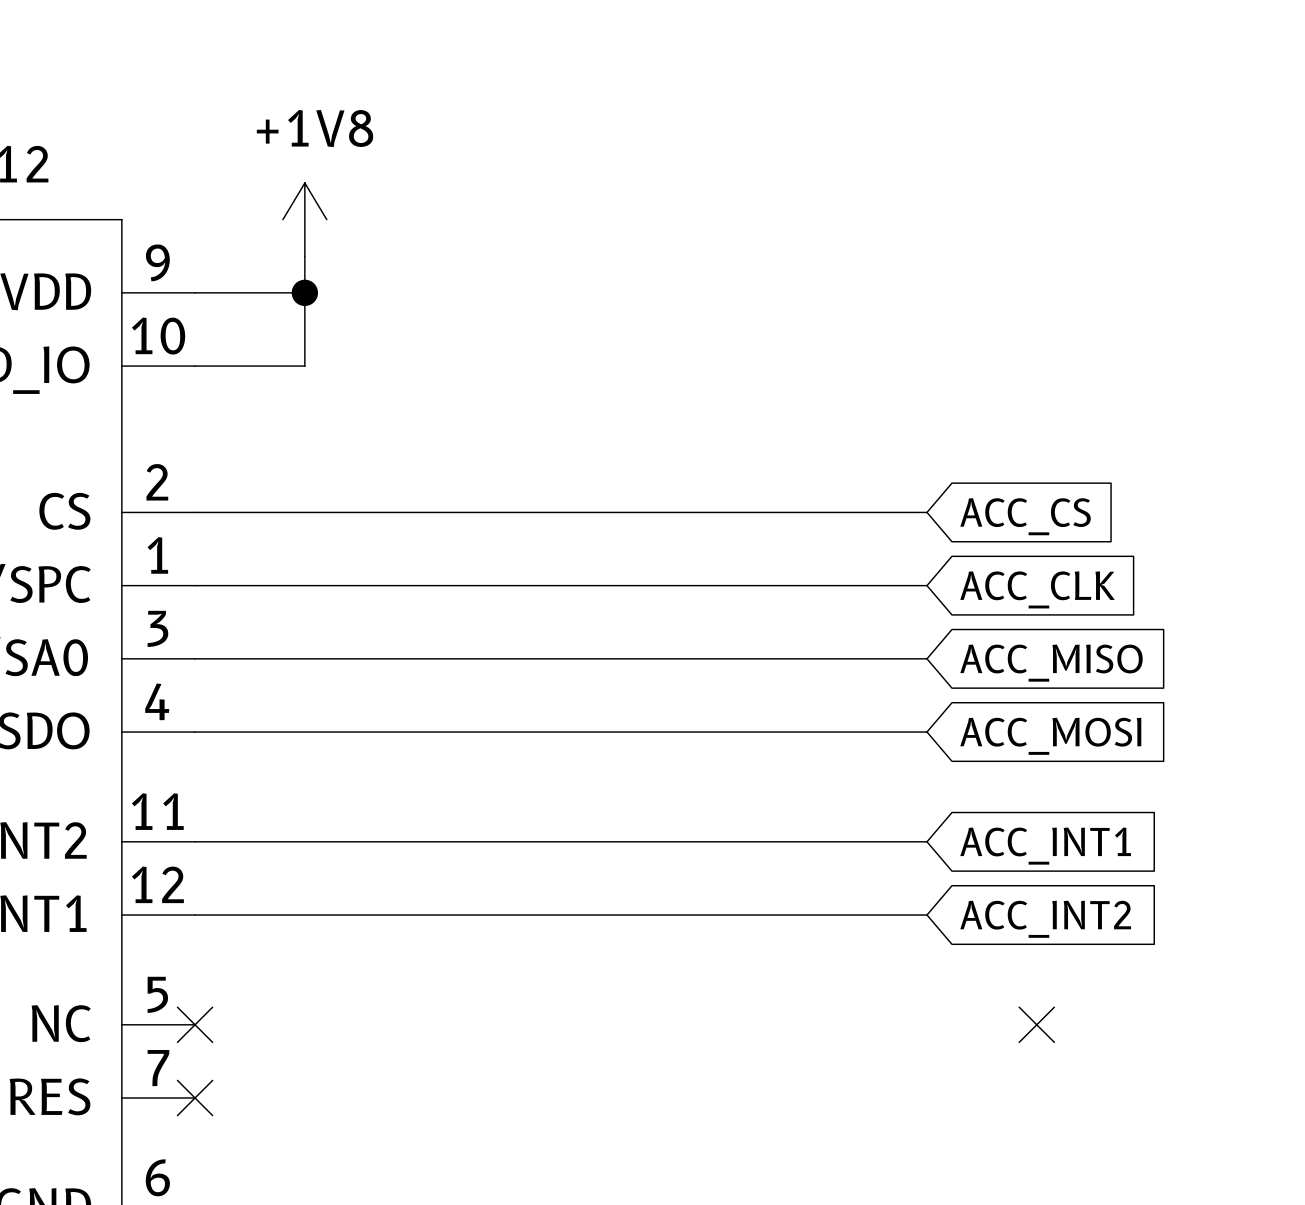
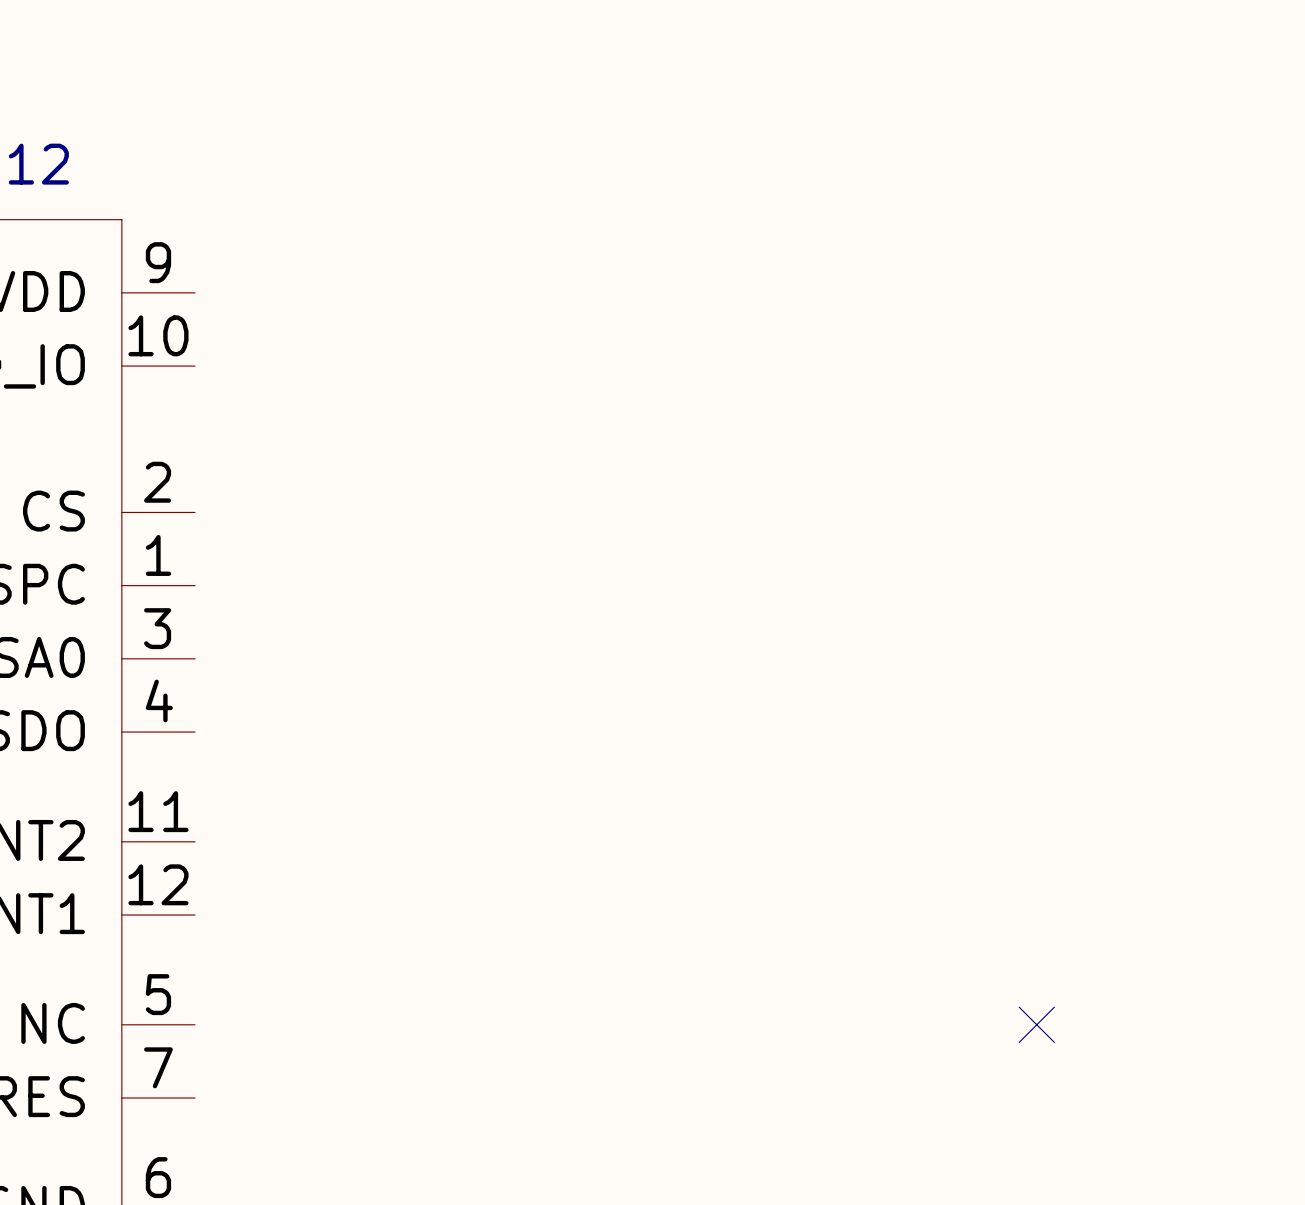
power symbol: +1V8 (304, 219) -> none
wire: (304, 256) (304, 366) (195, 366) -> none
wire: (195, 292) (304, 292) -> none
junction: (304, 292) -> none
wire: (195, 512) (927, 512) -> none
global label: ACC_CS (1025, 516) -> none
wire: (195, 585) (927, 585) -> none
global label: ACC_CLK (1037, 589) -> none
wire: (195, 658) (927, 658) -> none
global label: ACC_MISO (1051, 663) -> none
wire: (195, 732) (927, 732) -> none
global label: ACC_MOSI (1050, 736) -> none
wire: (195, 841) (927, 841) -> none
global label: ACC_INT1 (1045, 846) -> none
wire: (195, 915) (927, 915) -> none
global label: ACC_INT2 (1045, 919) -> none
no-connect mark: (195, 1024) -> none
no-connect mark: (195, 1098) -> none

